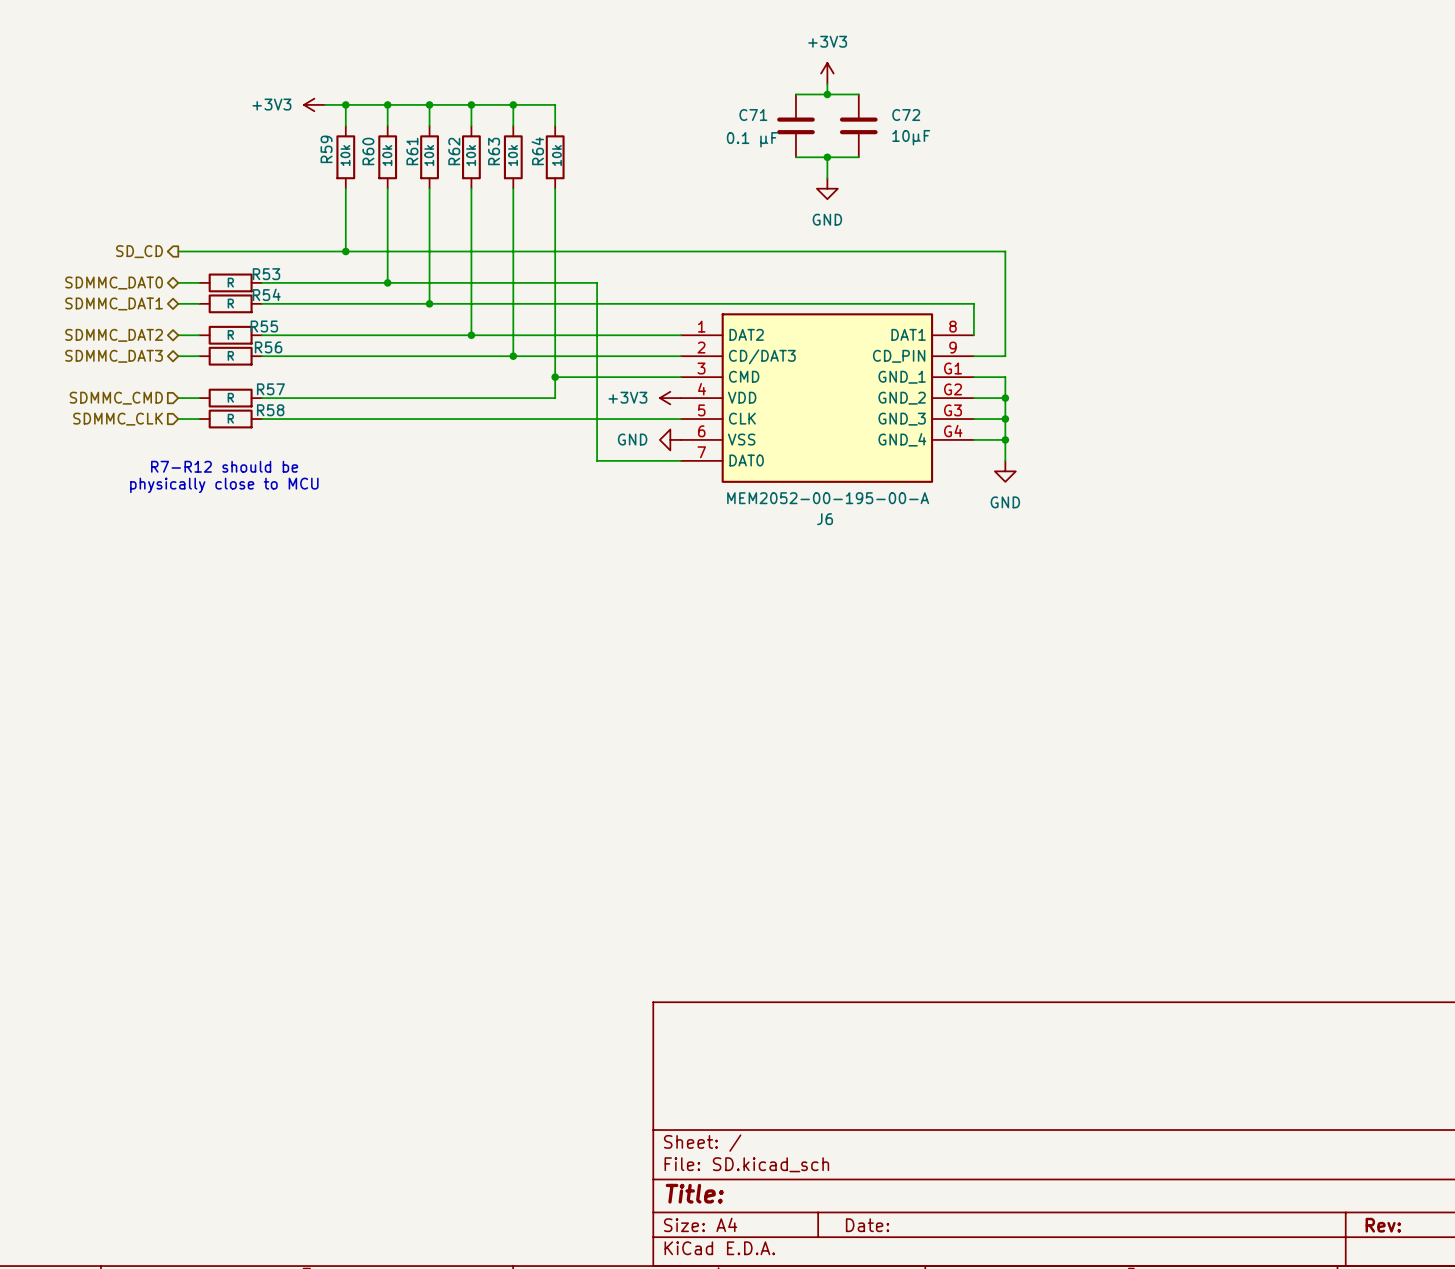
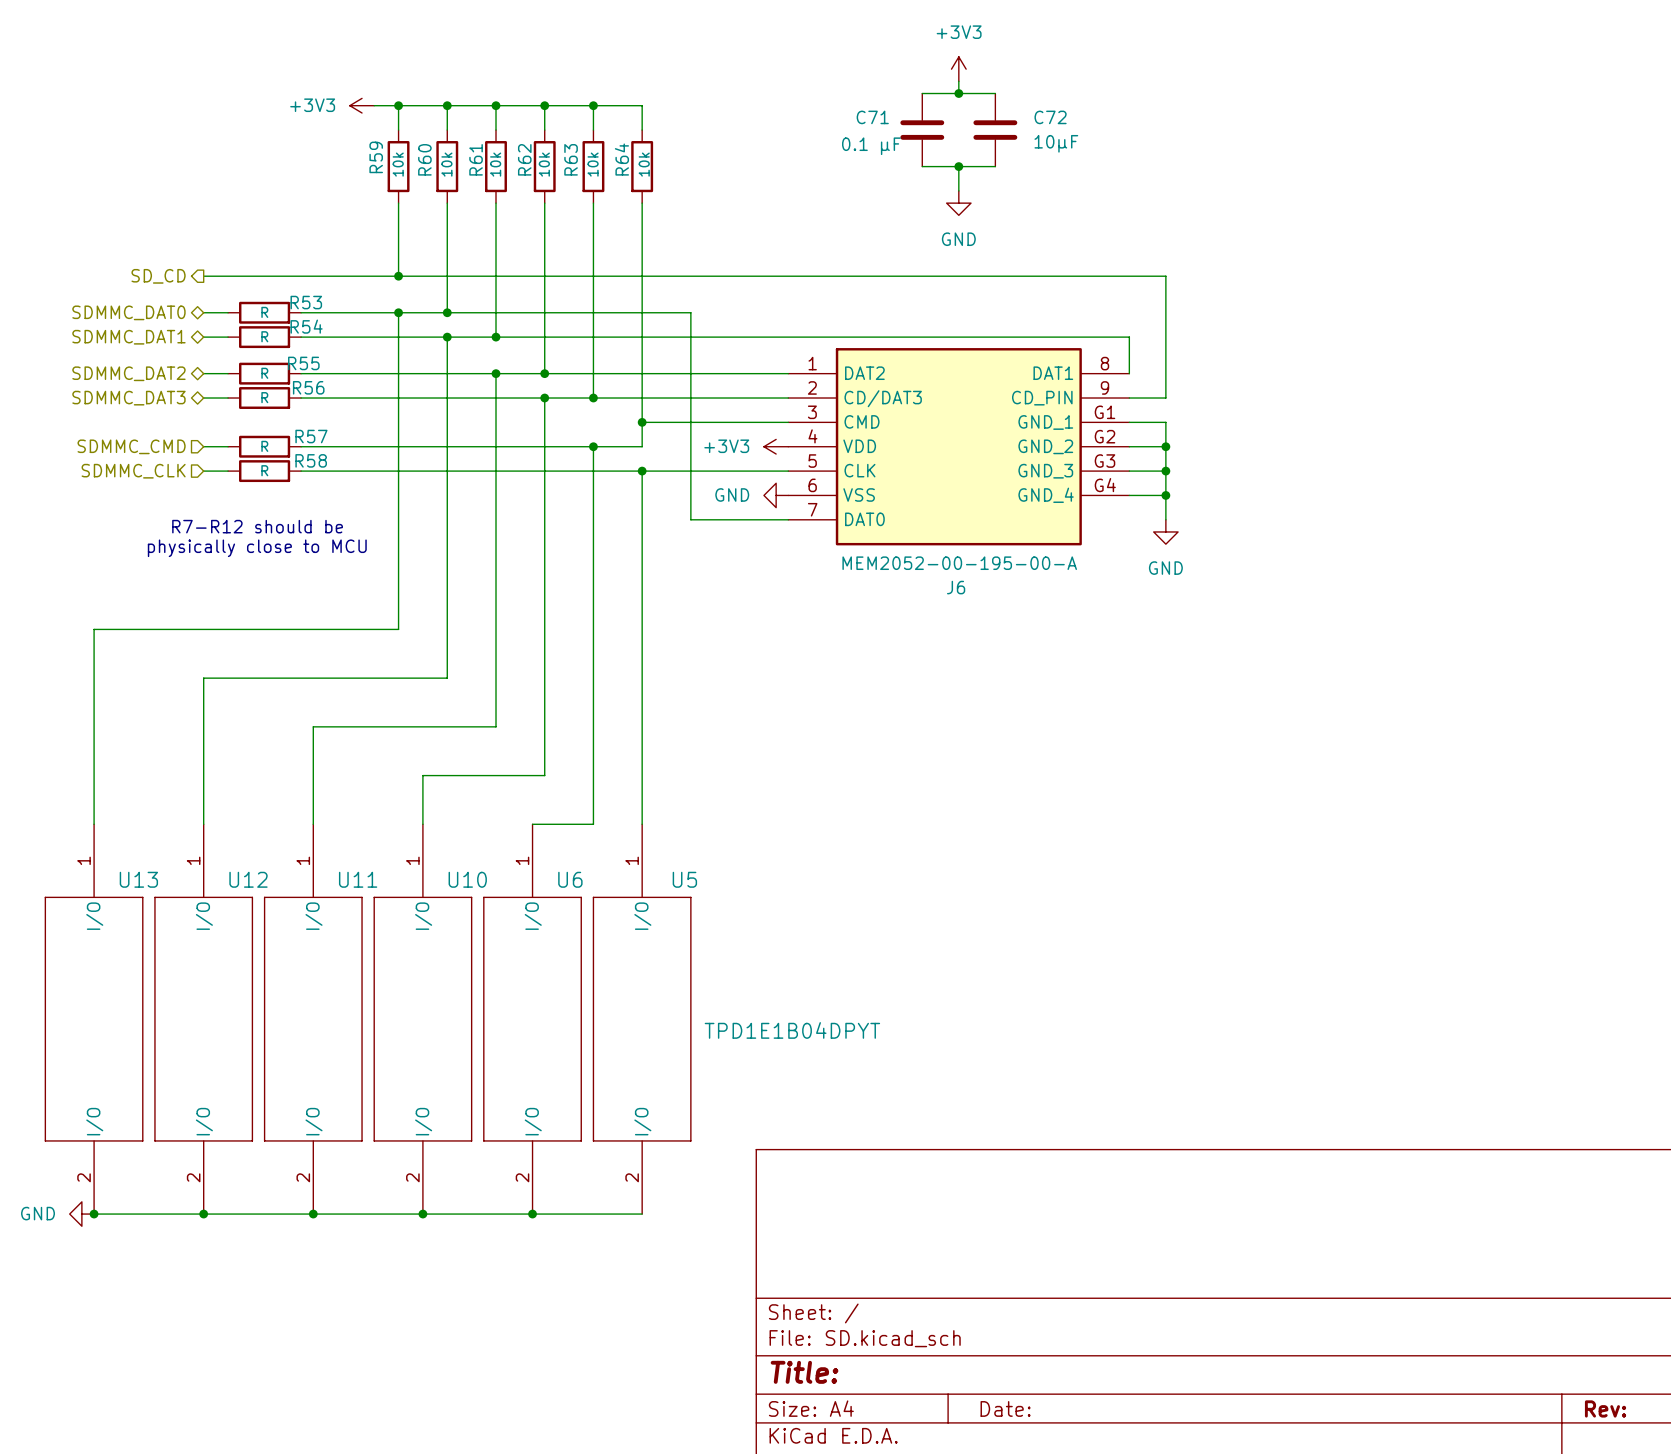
wire: none -> (398, 312) (398, 629) (94, 629) (94, 824)
junction: none -> (398, 312)
wire: none -> (447, 337) (447, 678) (203, 678) (203, 824)
junction: none -> (447, 337)
wire: none -> (496, 373) (496, 726) (313, 726) (313, 824)
junction: none -> (496, 373)
wire: none -> (544, 398) (544, 775) (422, 775) (422, 824)
junction: none -> (544, 398)
wire: none -> (593, 446) (593, 824) (532, 824)
junction: none -> (593, 446)
wire: none -> (642, 471) (642, 824)
junction: none -> (642, 471)
U13: none -> (94, 1019)
U12: none -> (203, 1019)
U11: none -> (313, 1019)
U10: none -> (422, 1019)
U6: none -> (532, 1019)
U5: none -> TPD1E1B04DPYT (642, 1019)
power symbol: none -> GND (81, 1214)
wire: none -> (94, 1214) (642, 1214)
junction: none -> (94, 1214)
junction: none -> (203, 1214)
junction: none -> (313, 1214)
junction: none -> (422, 1214)
junction: none -> (532, 1214)

